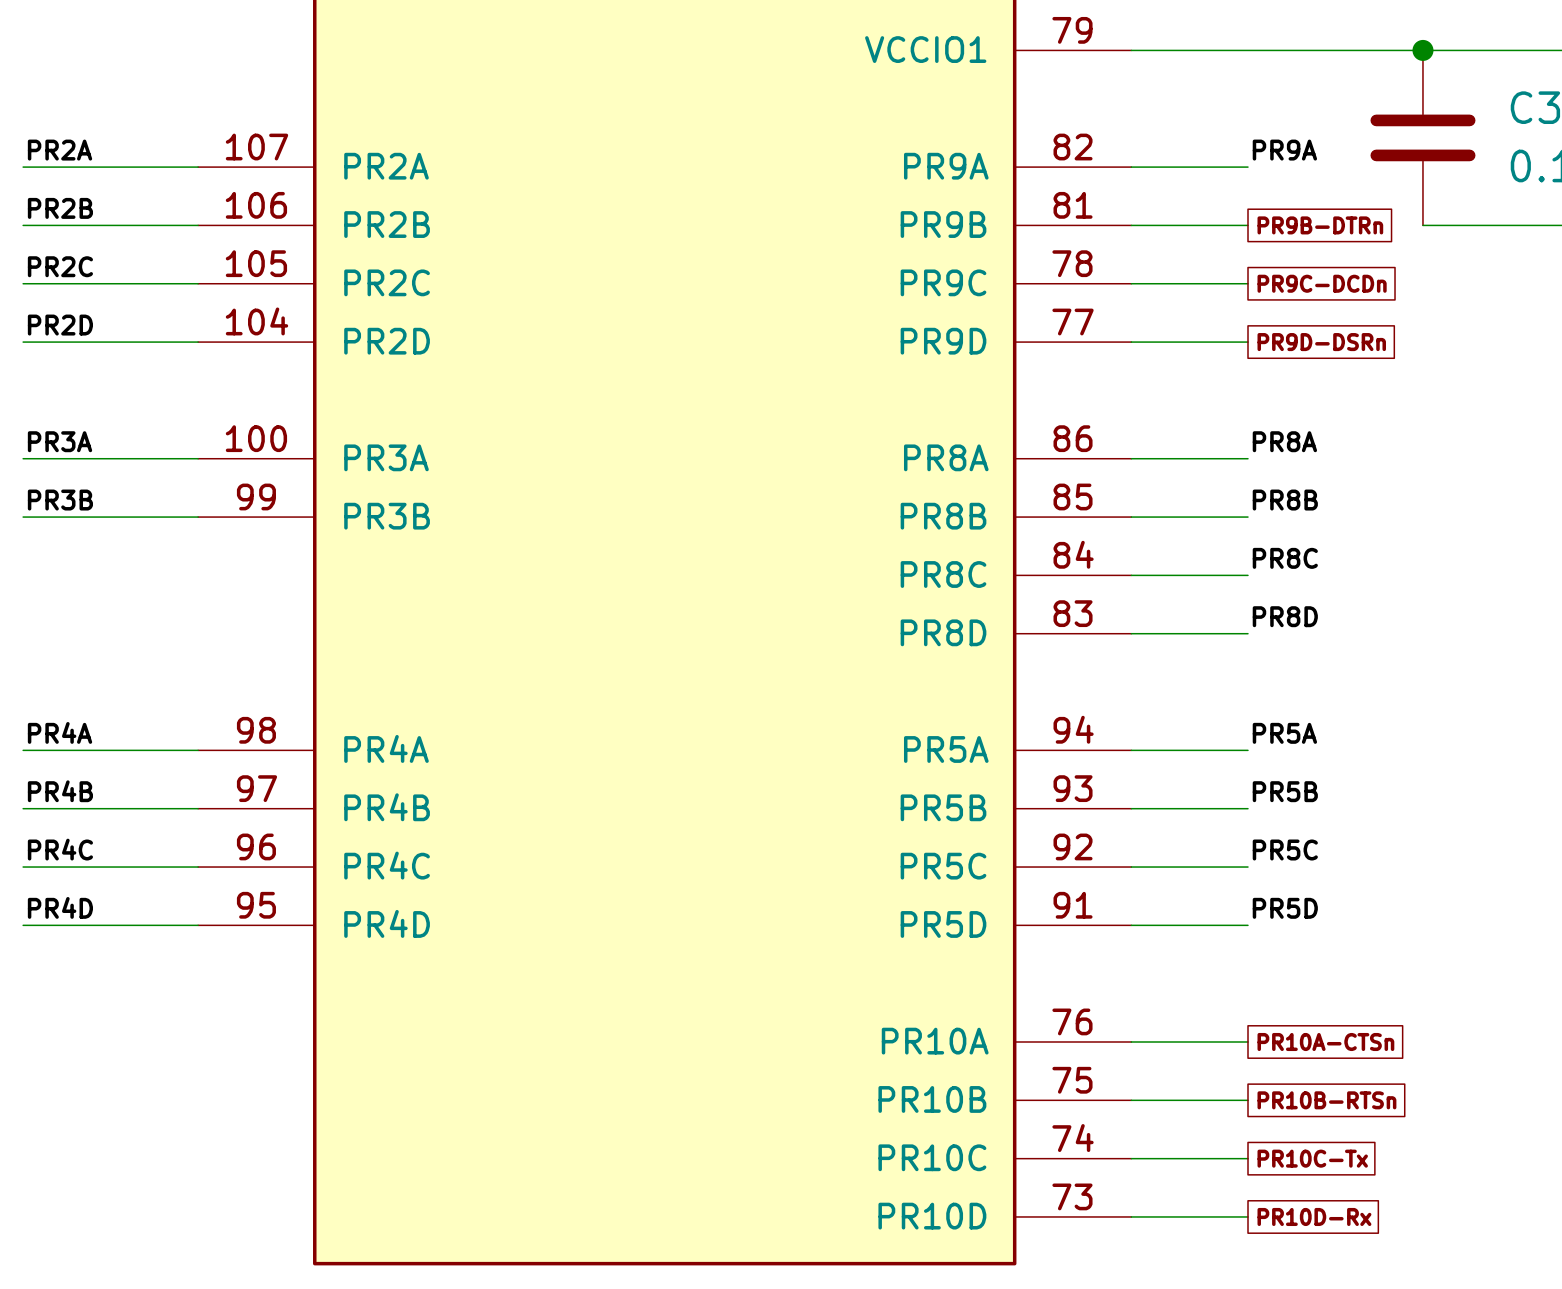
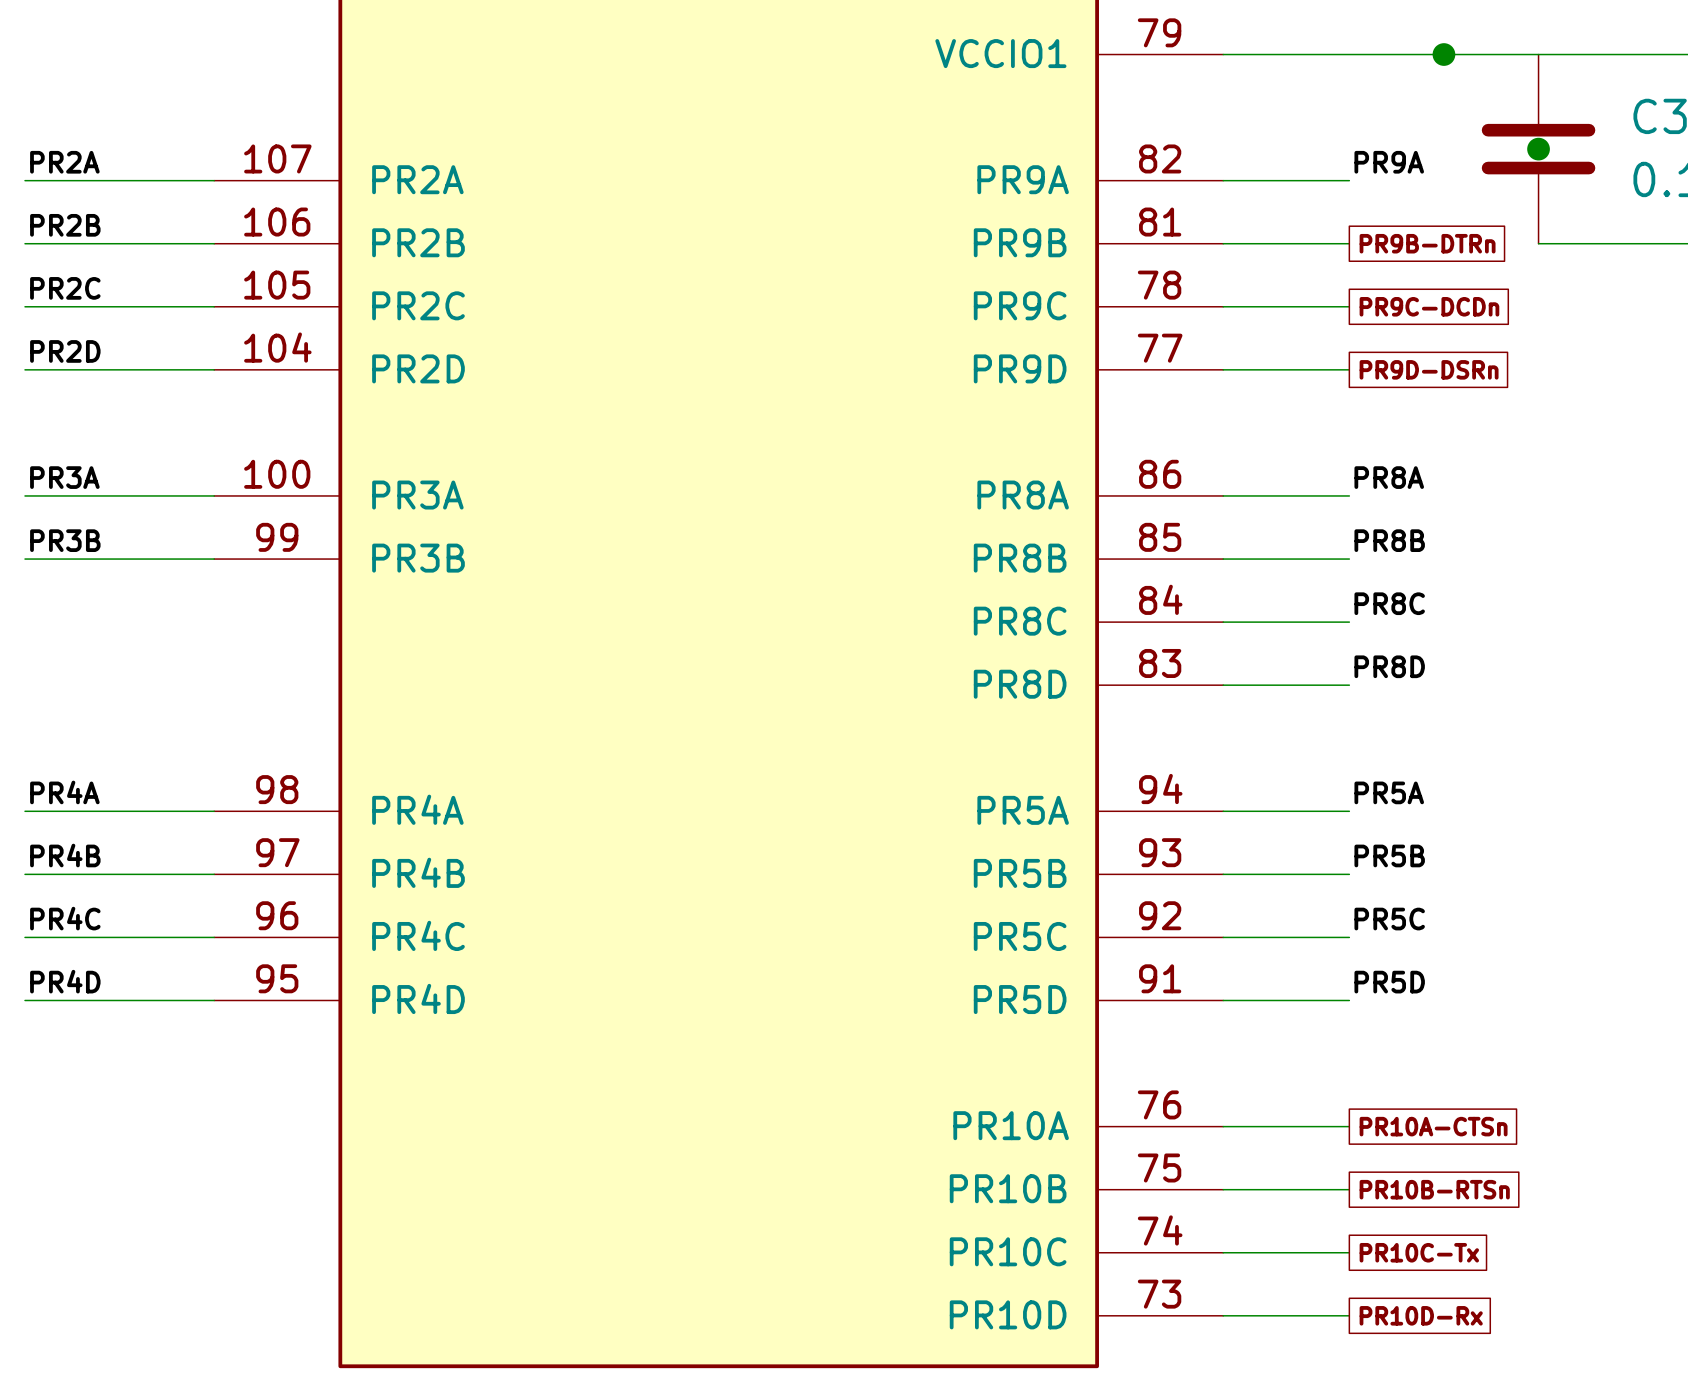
junction: none -> (1443, 54)
junction: (1422, 50) -> none
junction: none -> (1538, 149)

